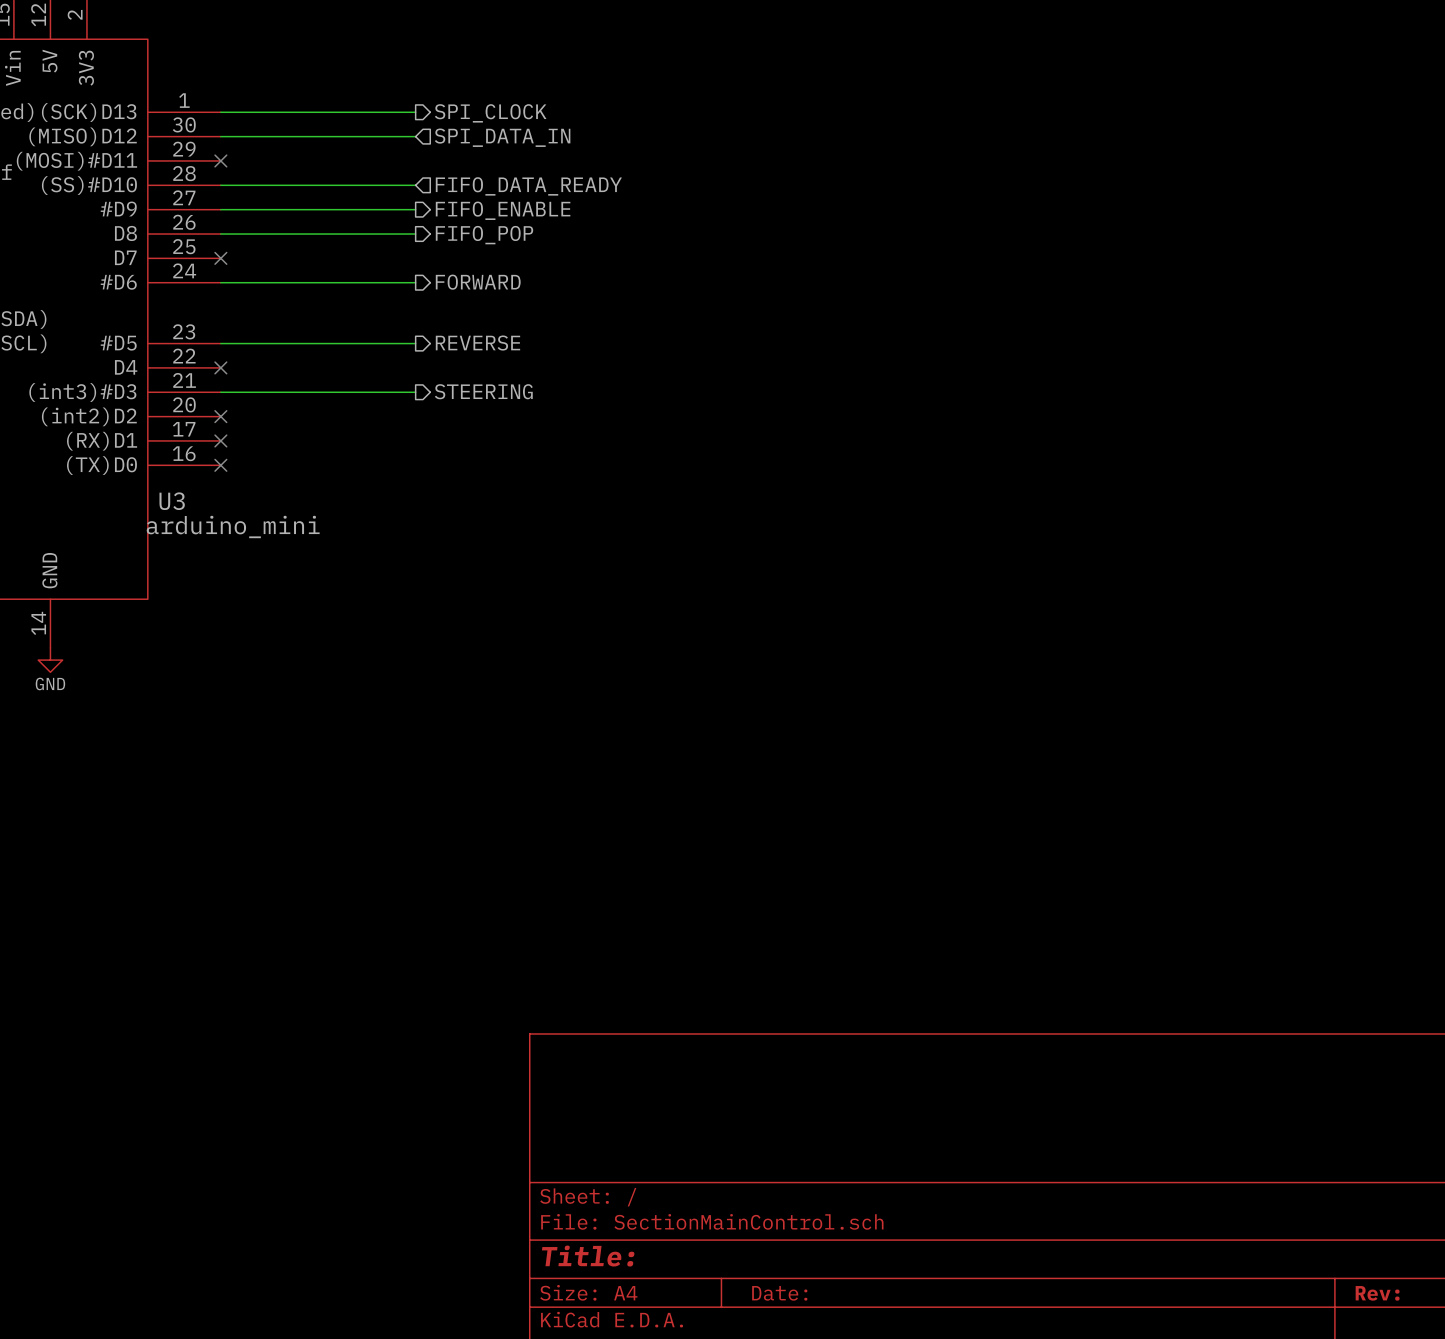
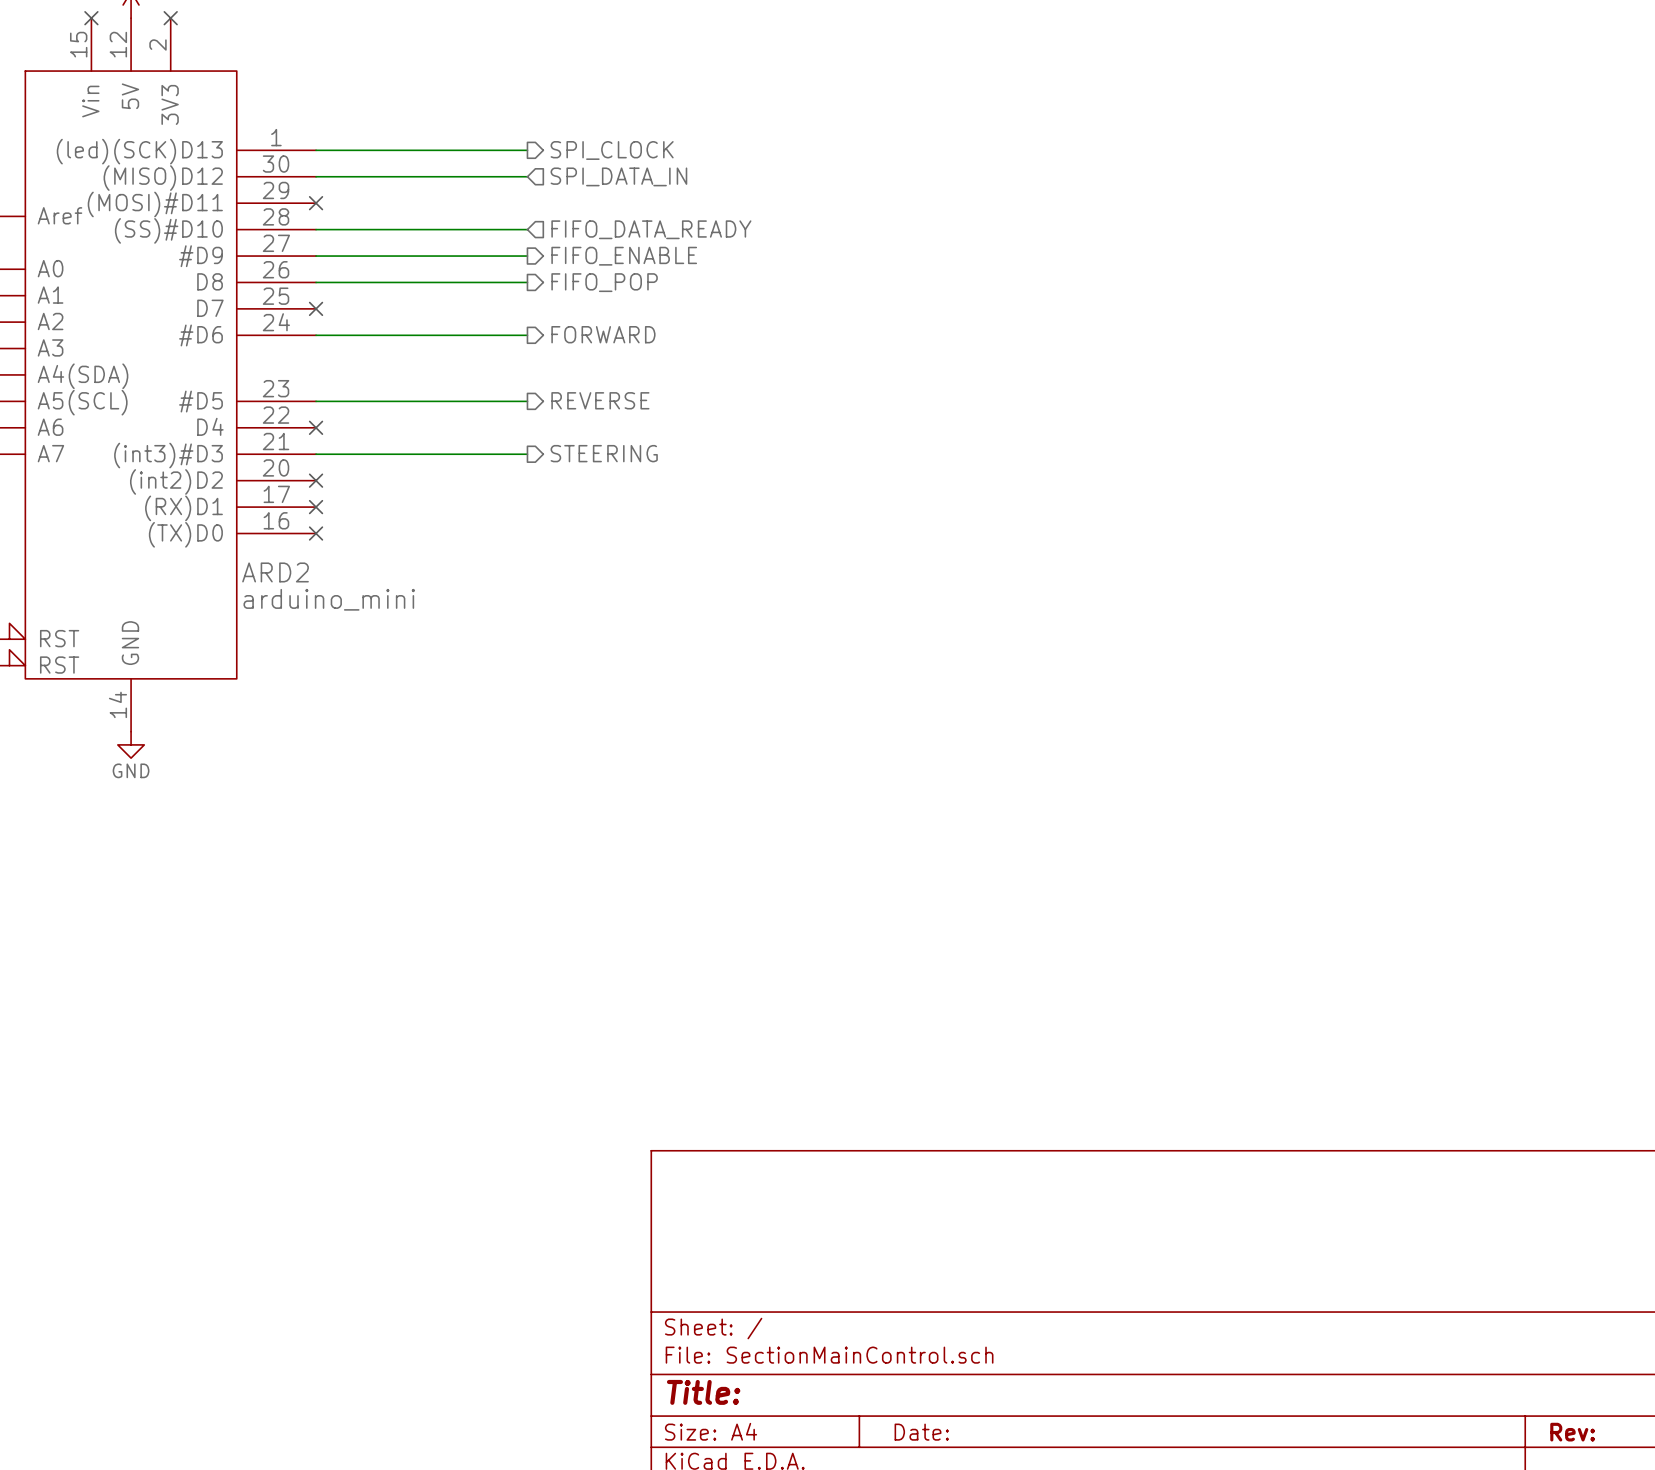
U3 name: U3 (172, 501) -> ARD2 (275, 572)

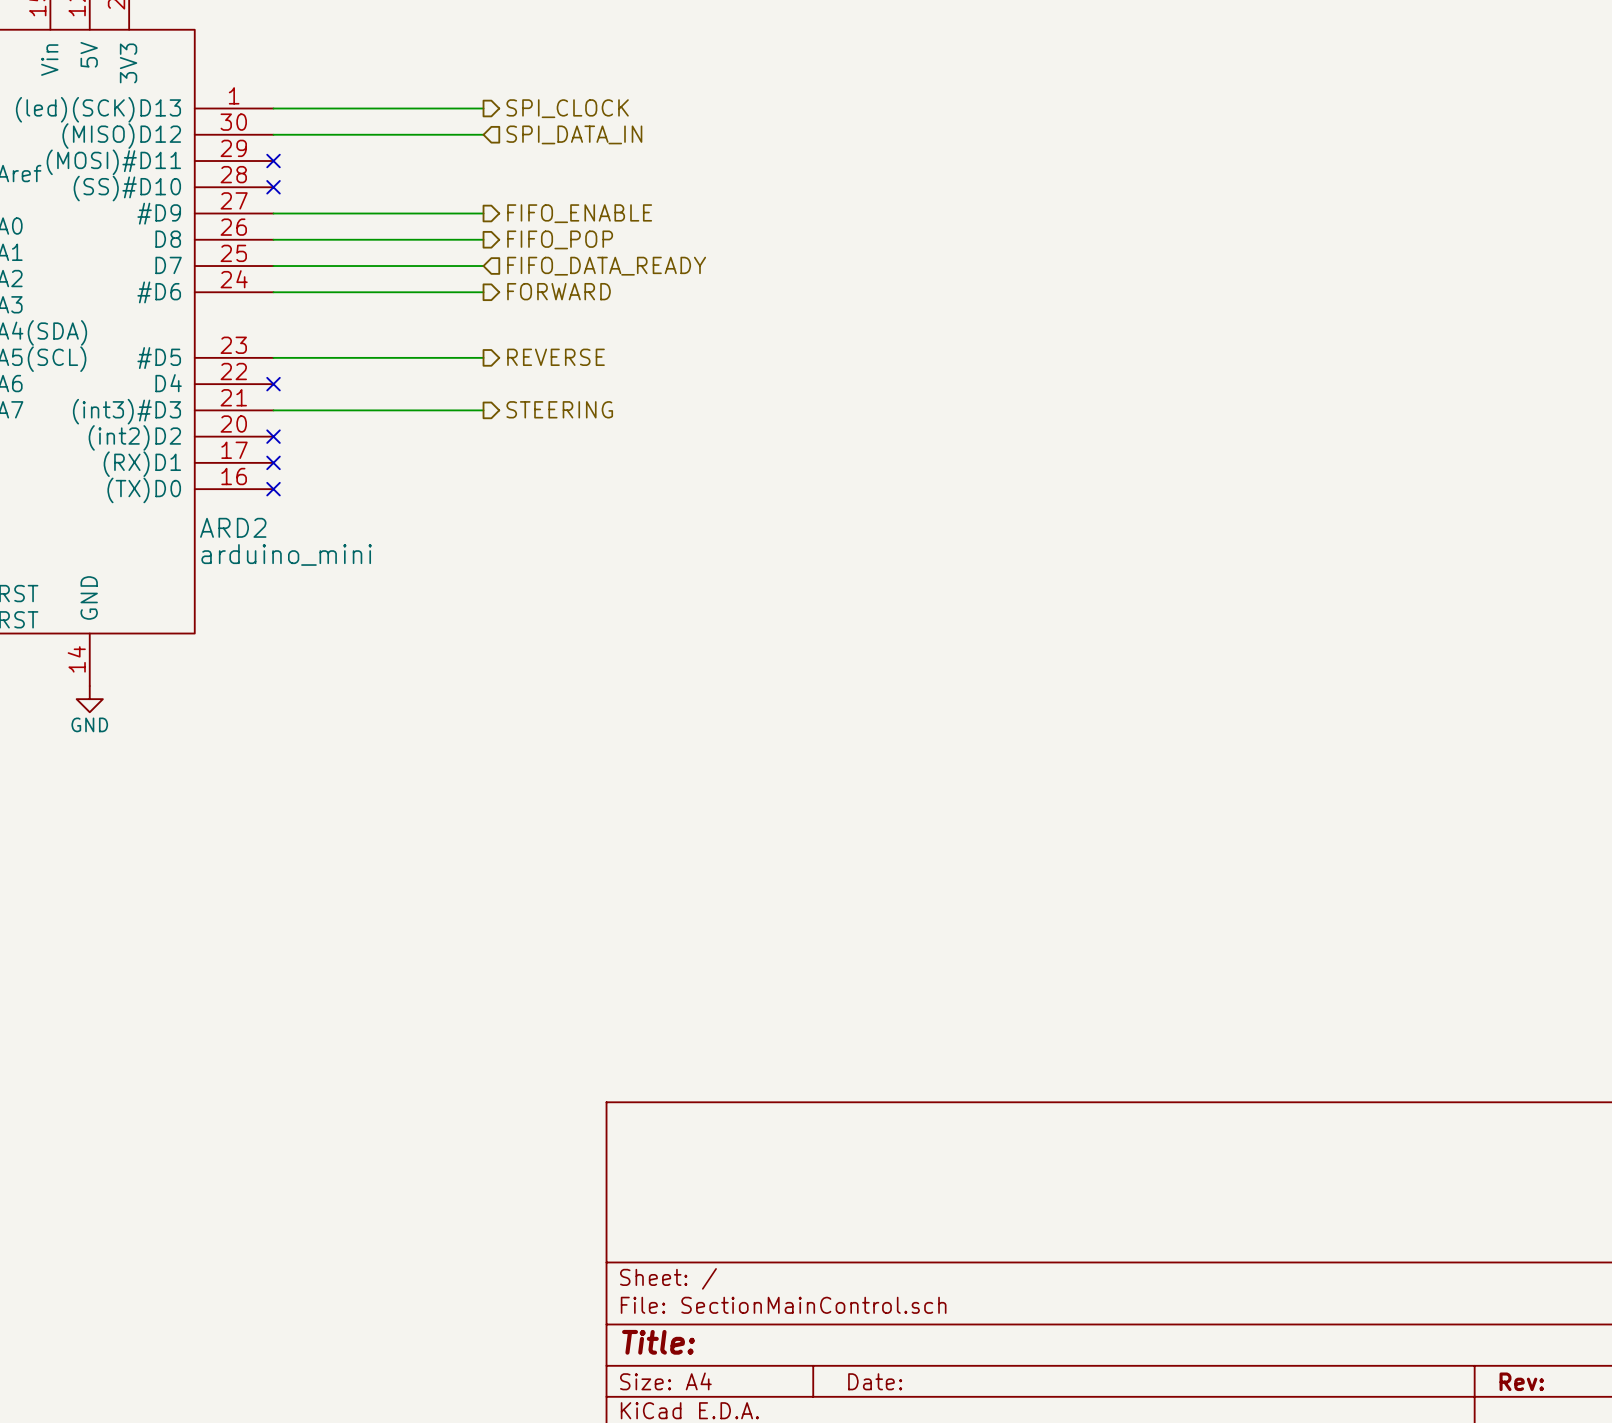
wire: (316, 229) (527, 229) -> (273, 266) (483, 266)
no-connect mark: none -> (273, 187)
hierarchical label position: FIFO_DATA_READY (651, 229) -> FIFO_DATA_READY (606, 266)
no-connect mark: (316, 308) -> none

